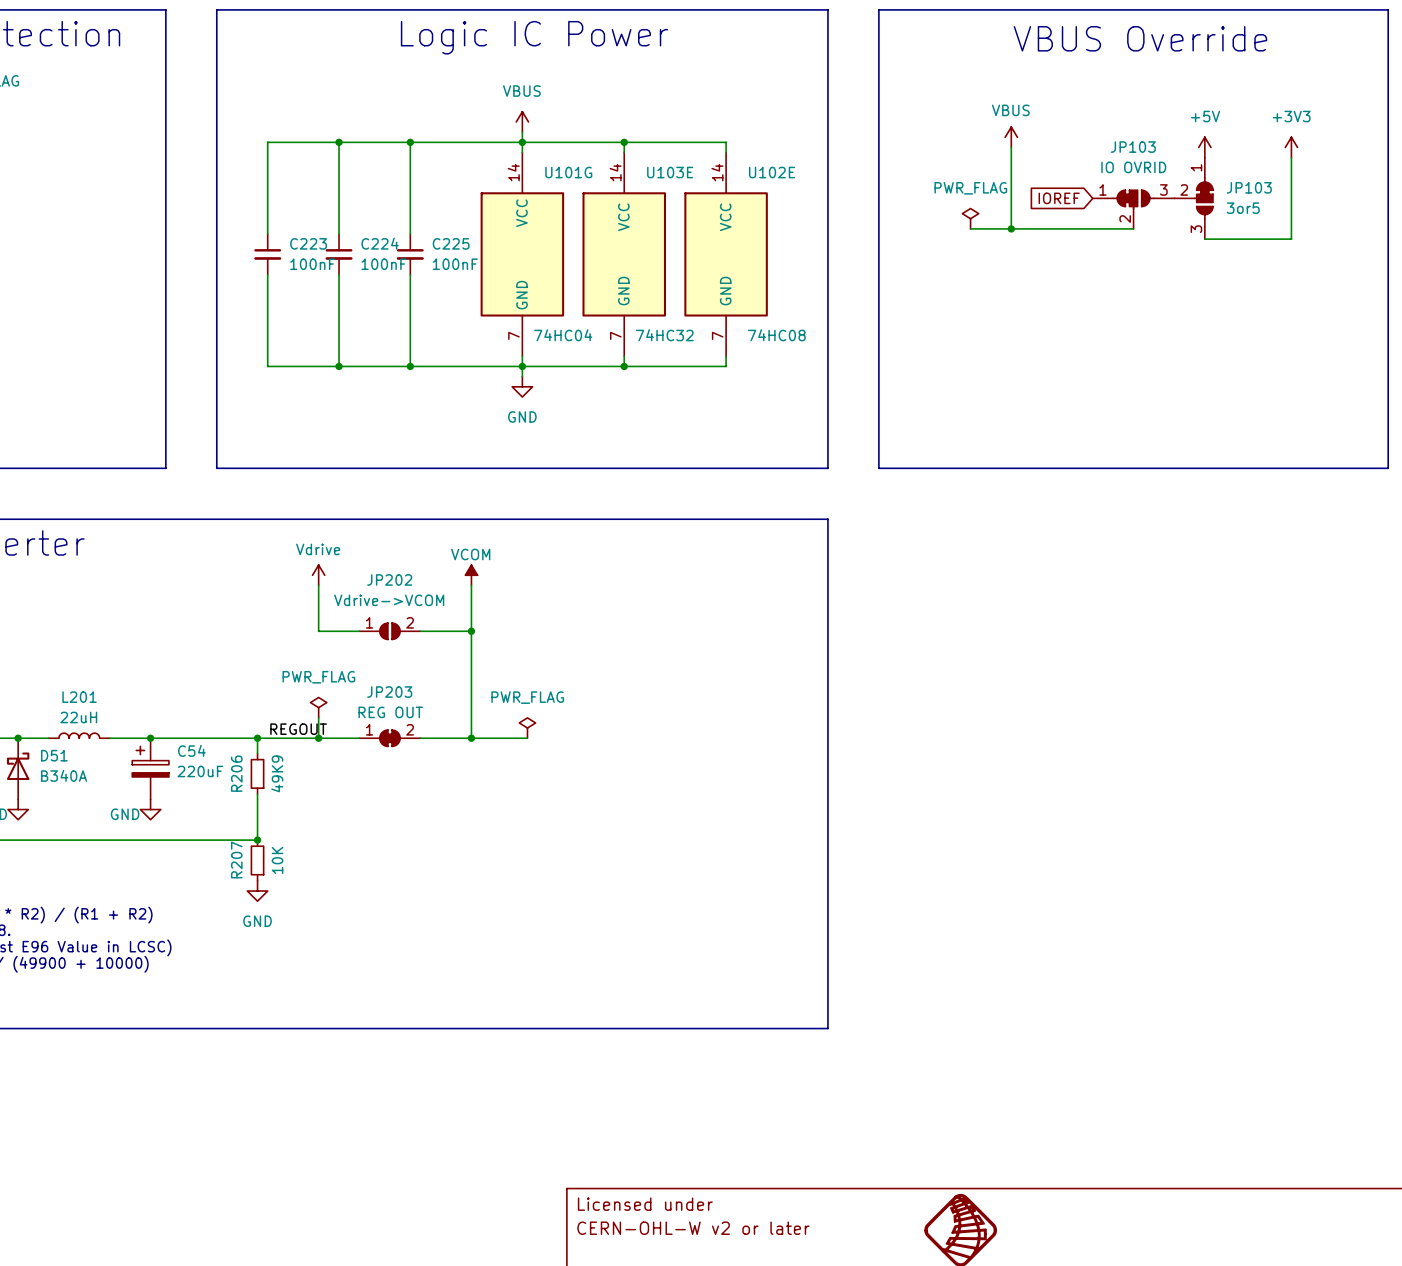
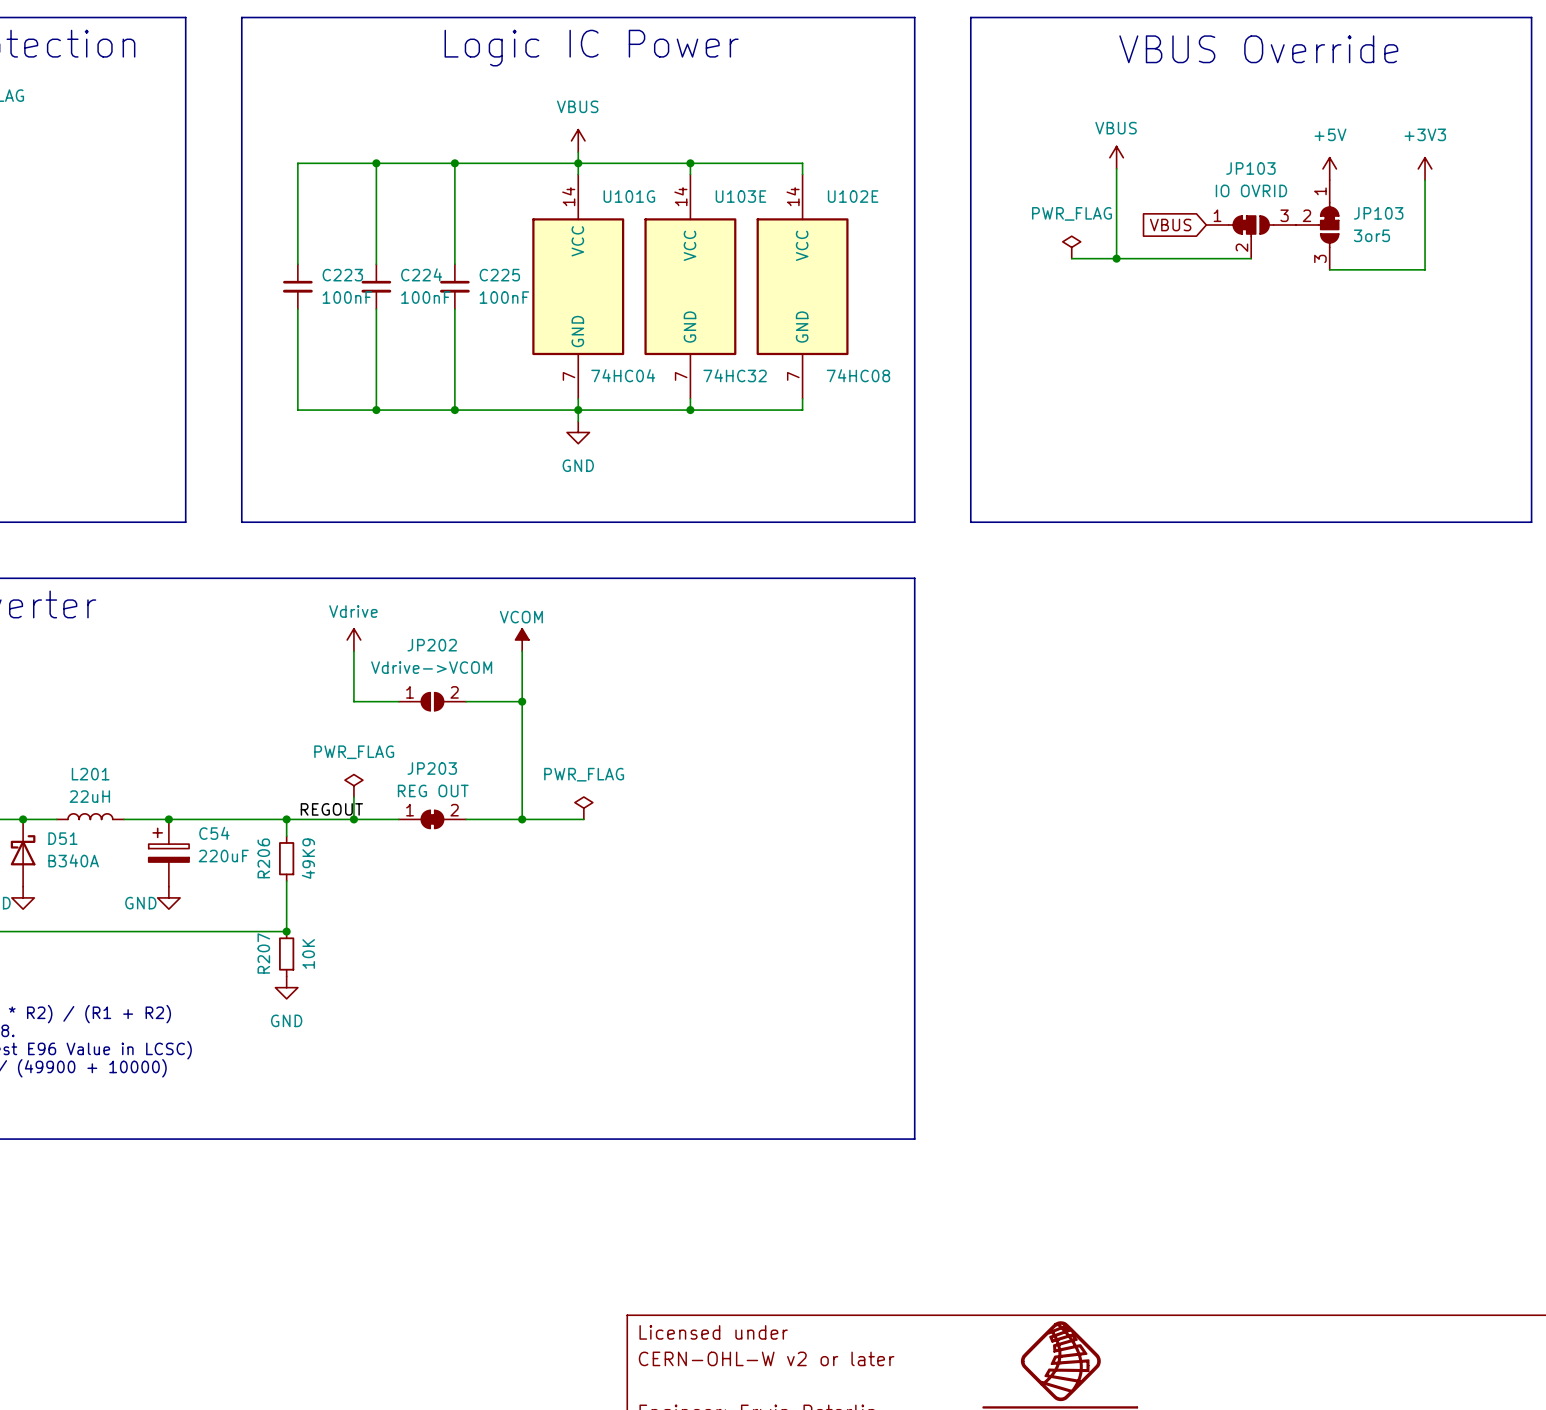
global label: IOREF (1059, 198) -> VBUS (1170, 225)

